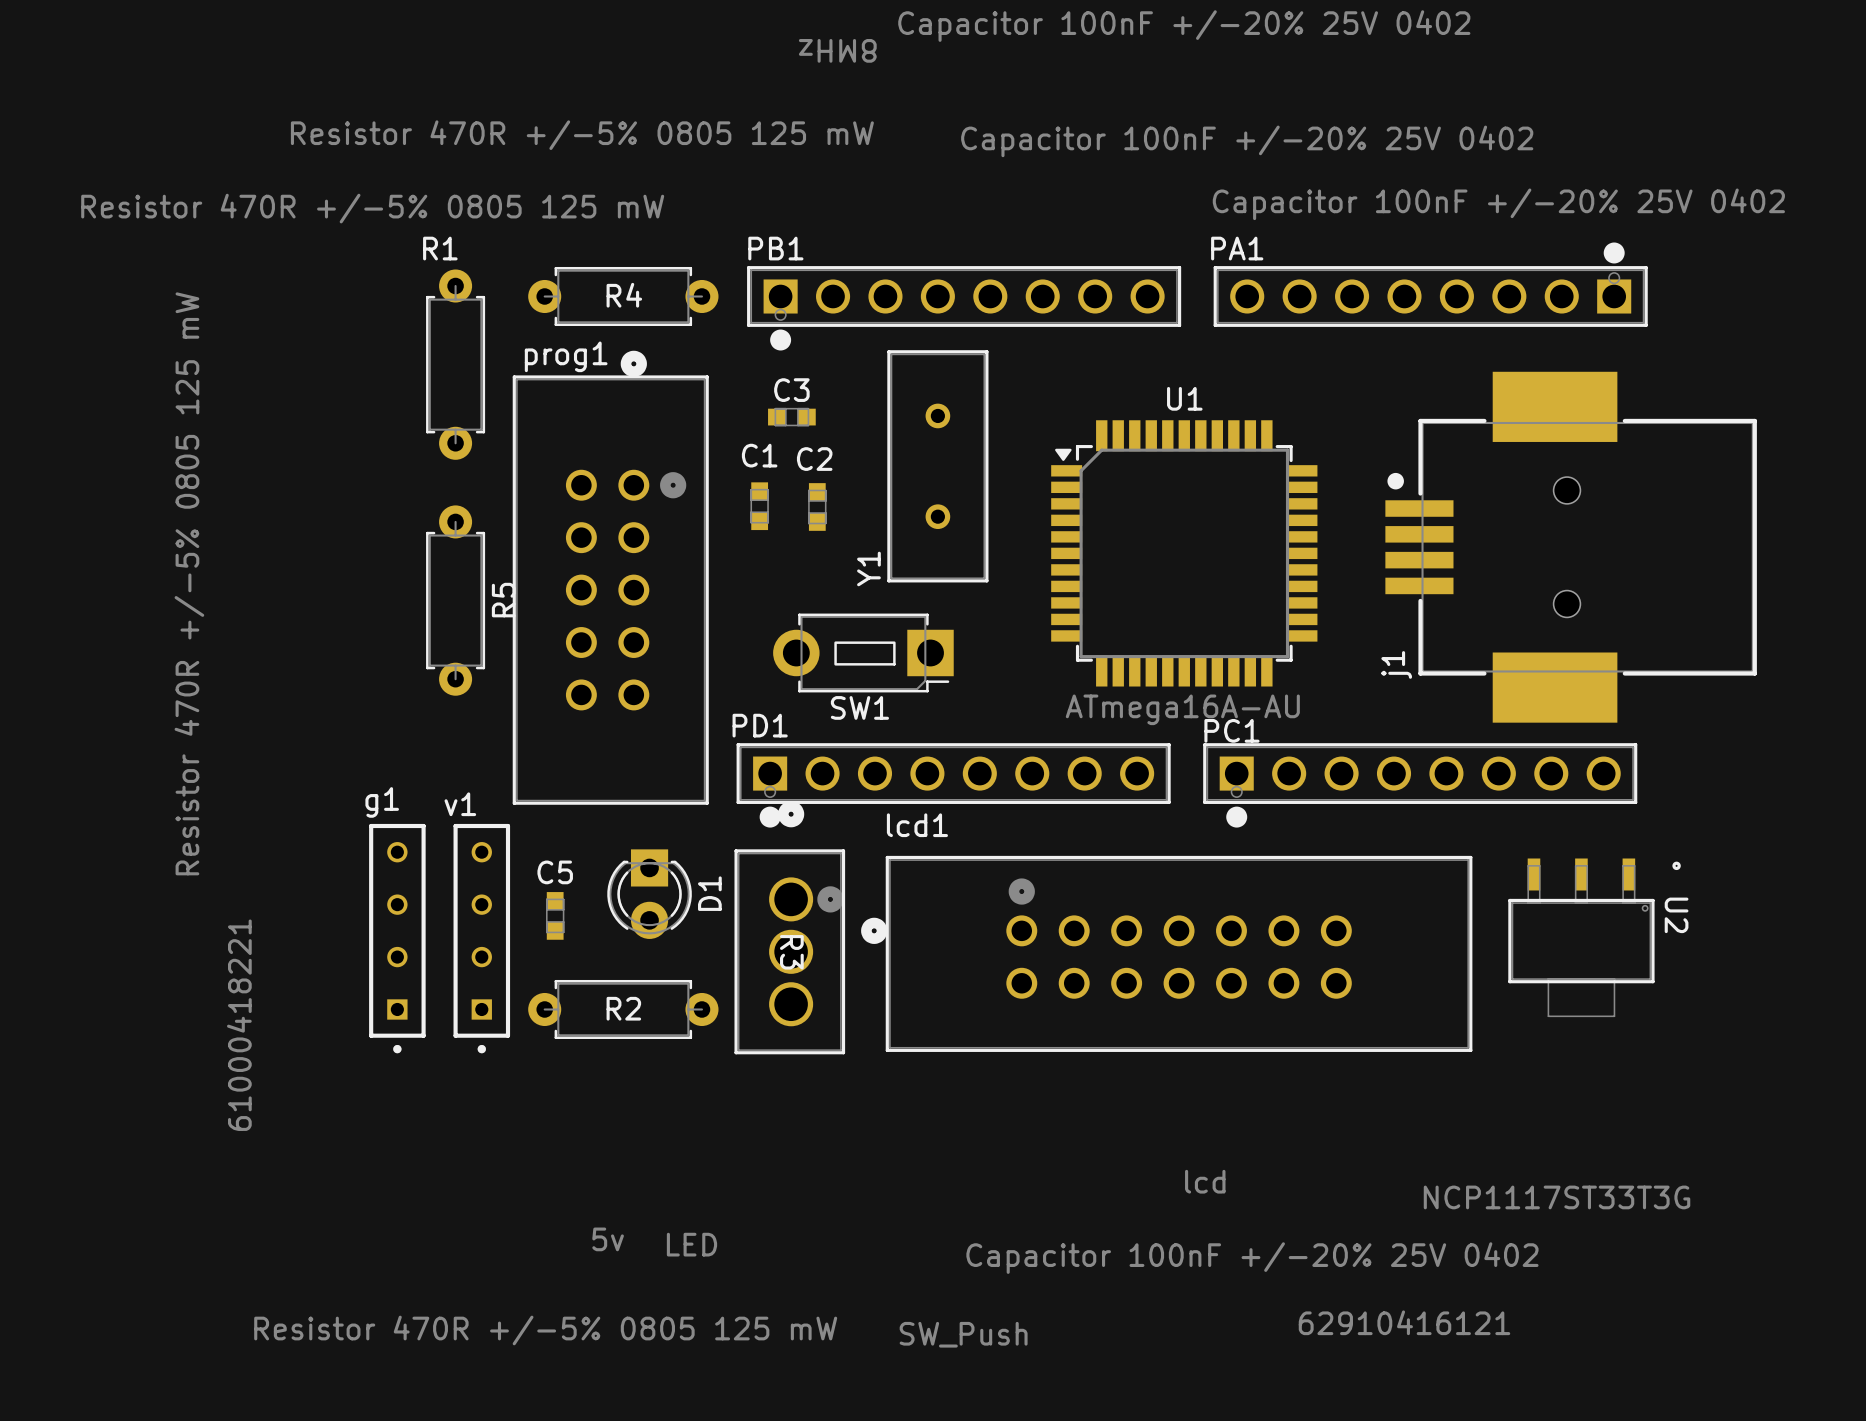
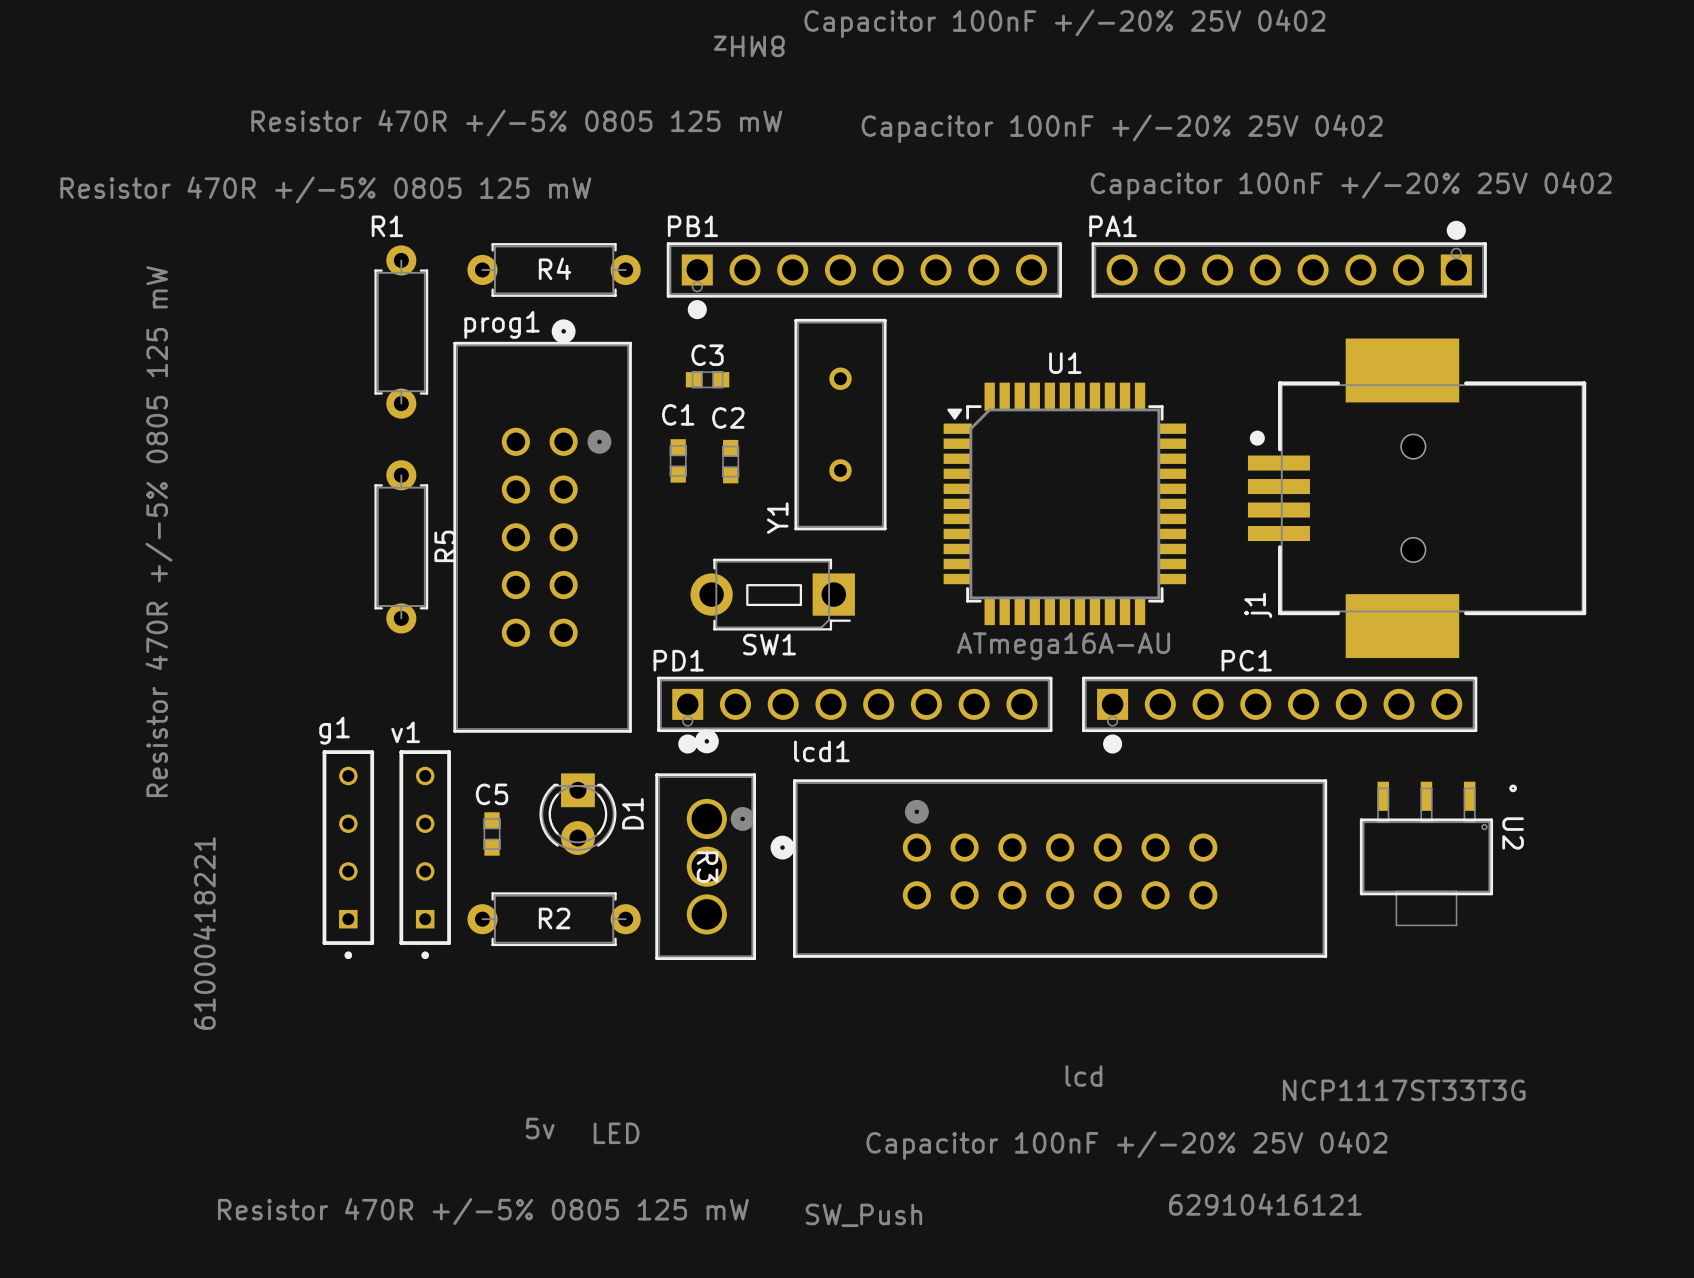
PC1 name position: PC1 (1231, 730) -> PC1 (1246, 660)

